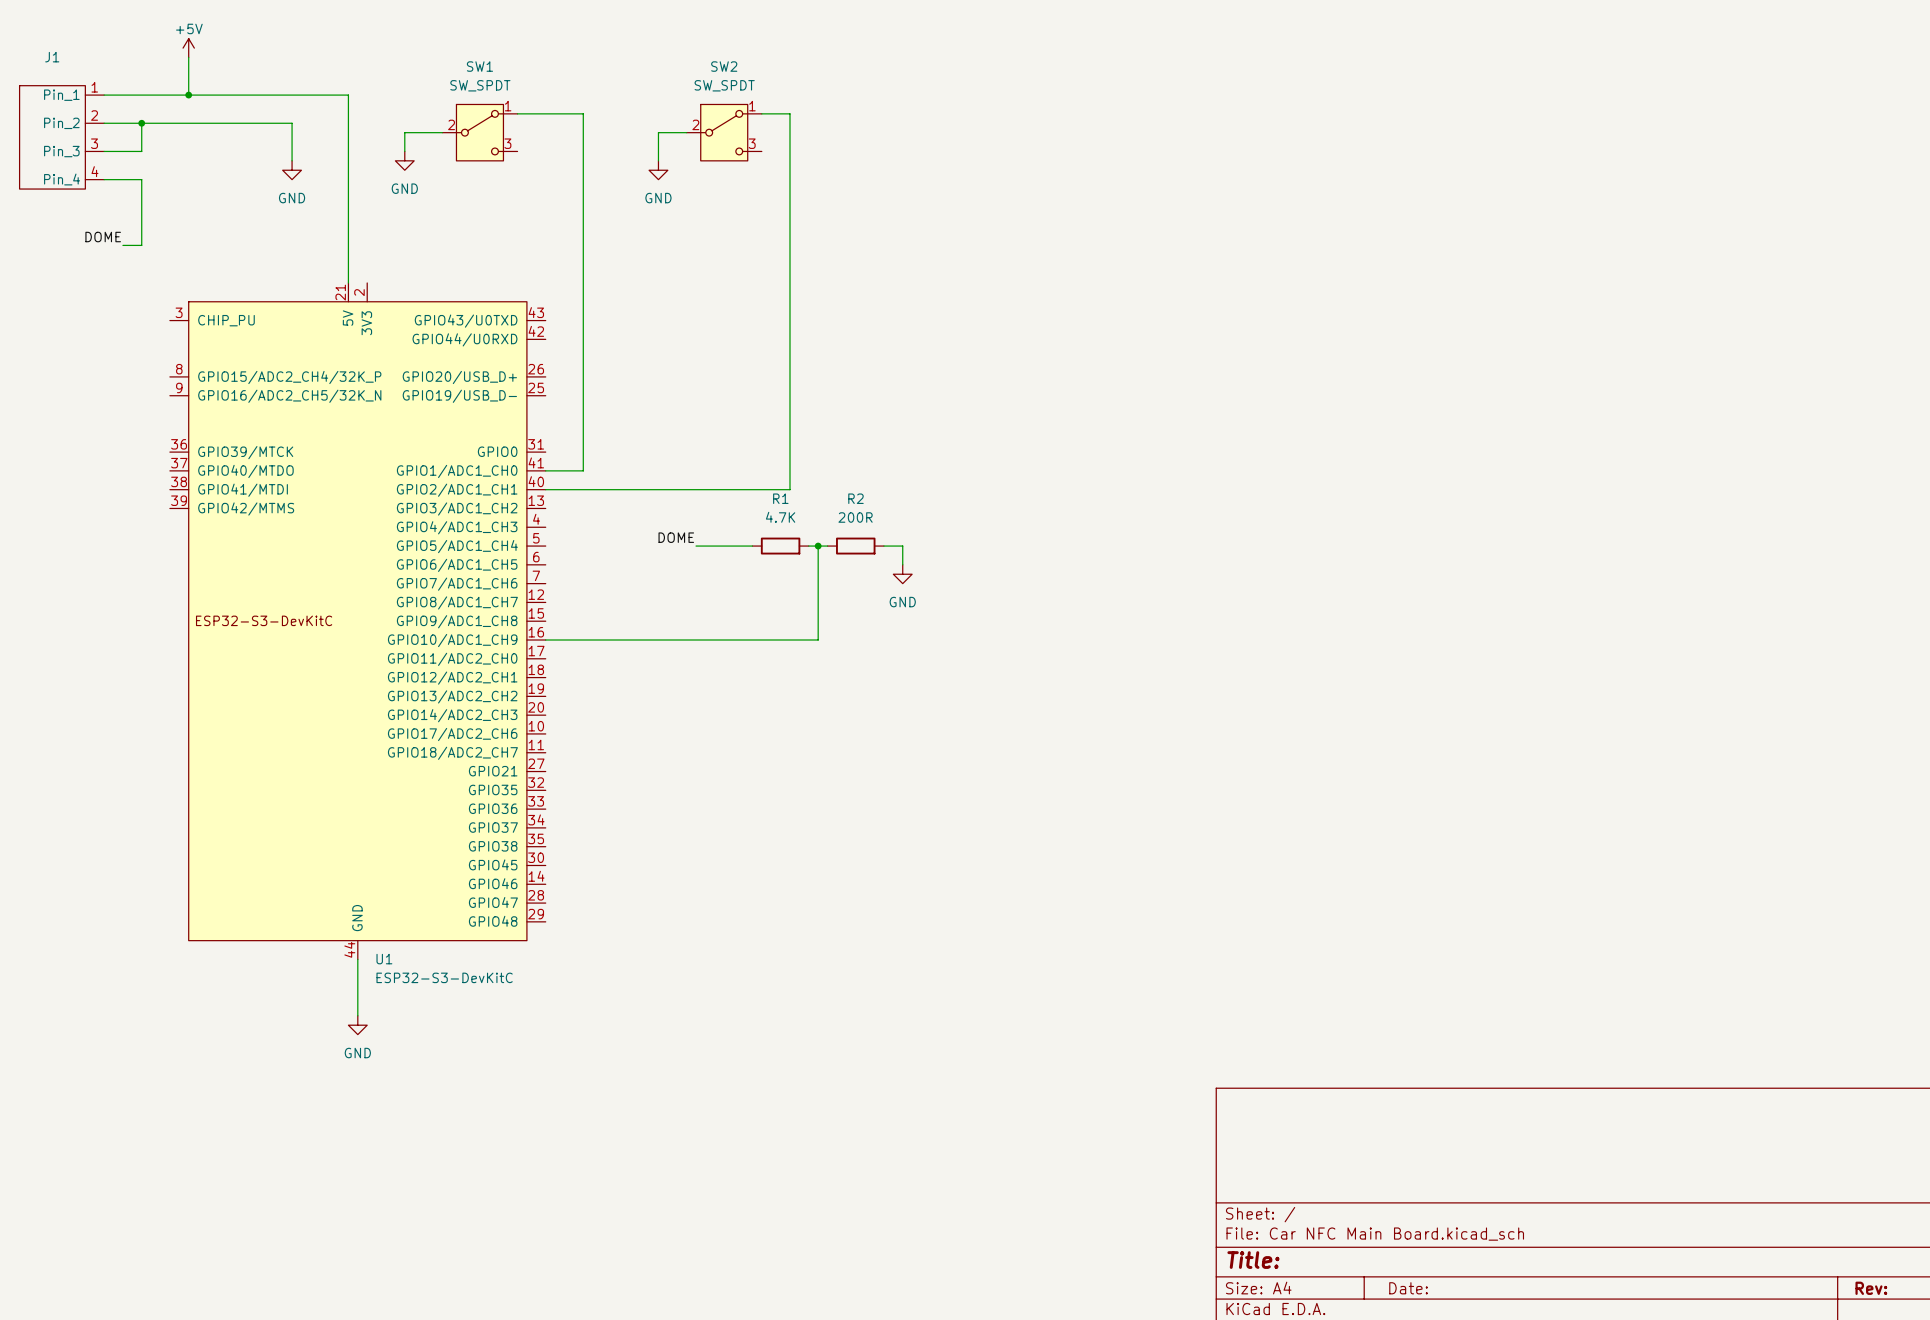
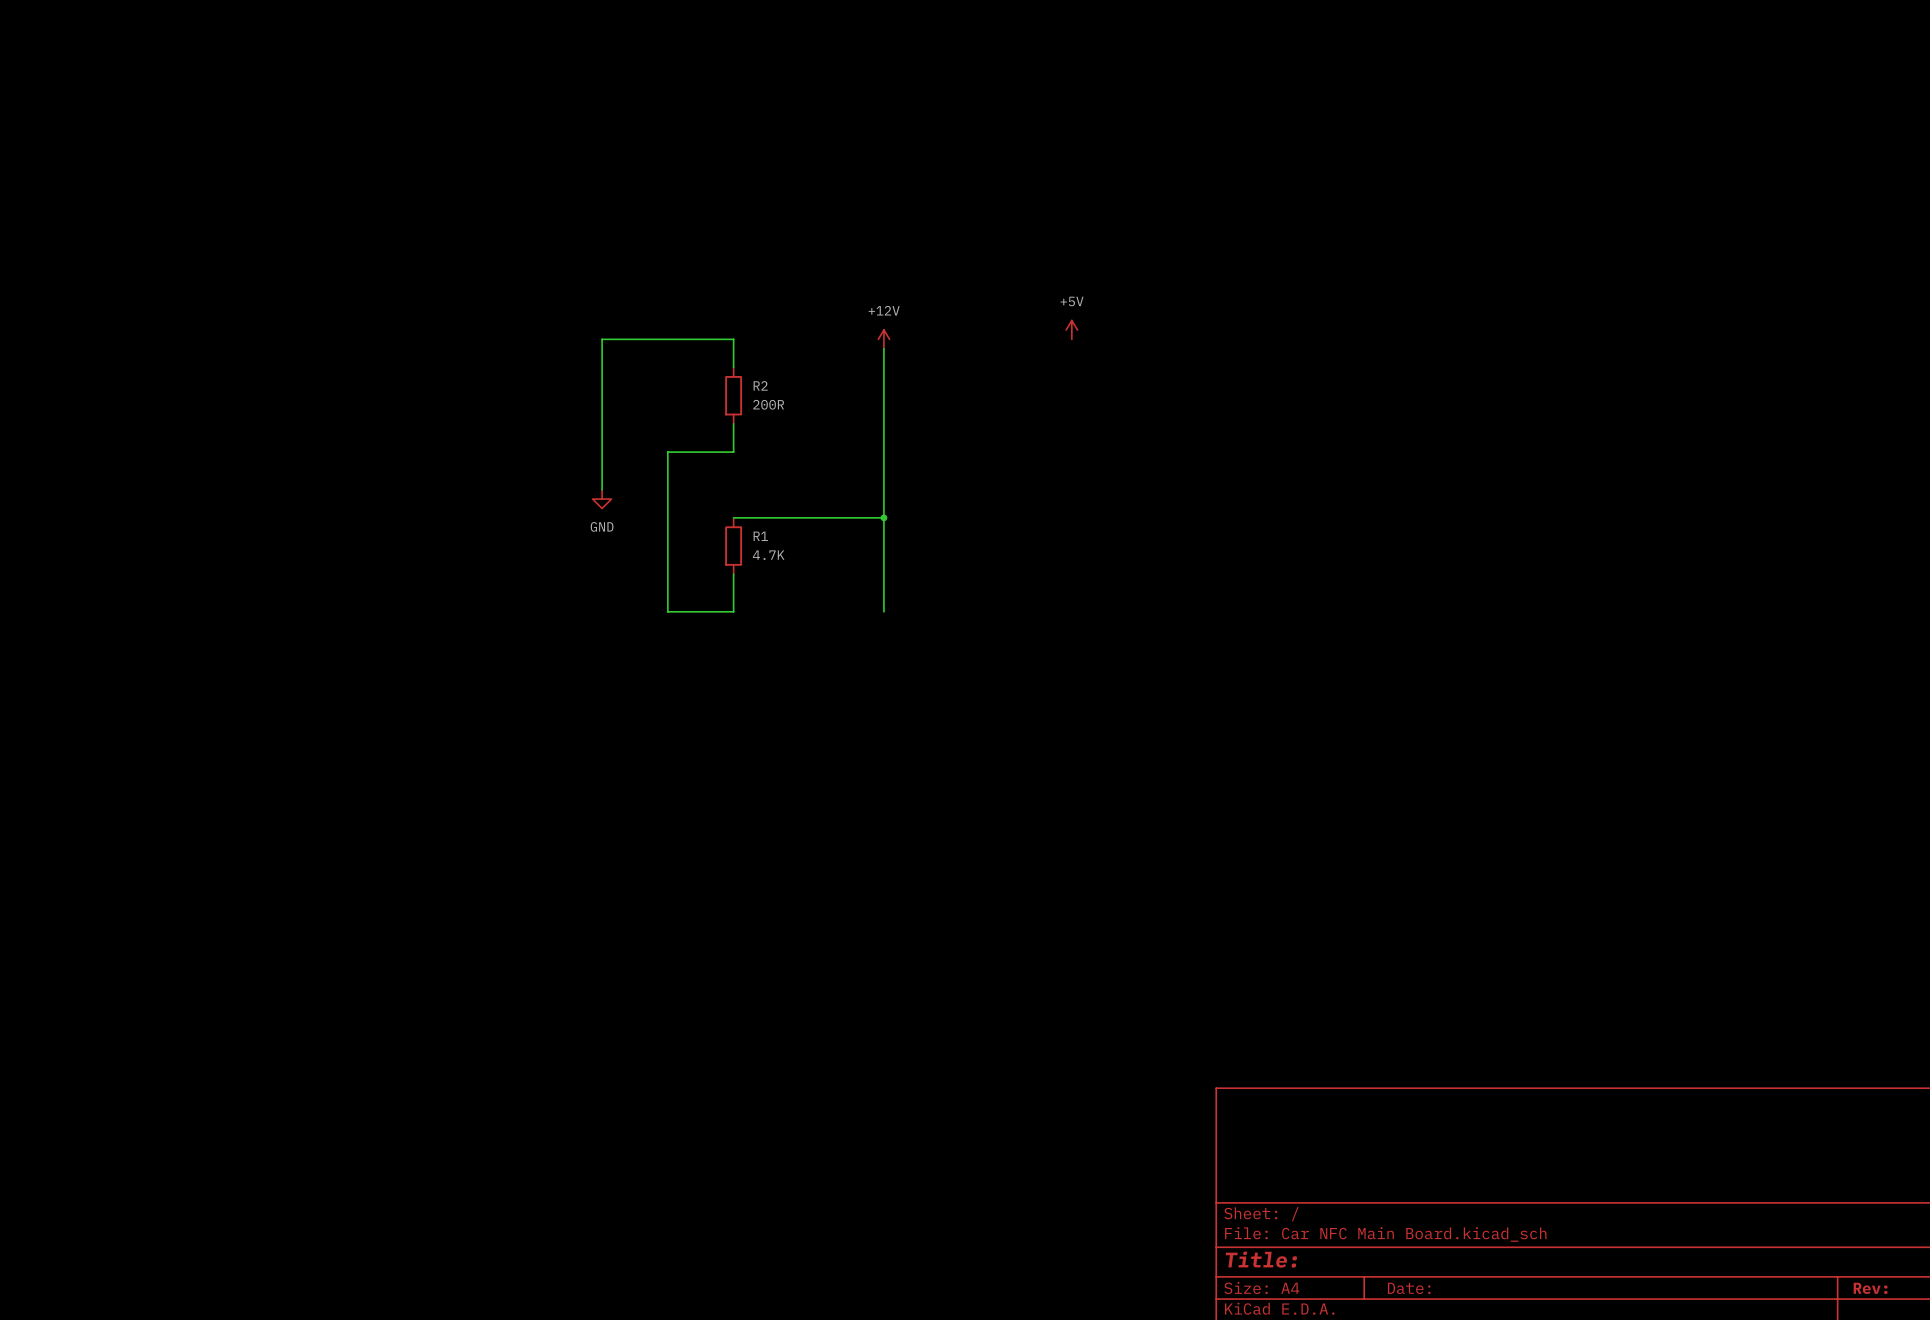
power symbol: +5V (188, 48) -> none
wire: (188, 57) (188, 95) -> none
wire: (104, 95) (348, 95) (348, 282) -> none
junction: (188, 95) -> none
wire: (517, 113) (583, 113) (583, 470) (545, 470) -> none
wire: (761, 113) (789, 113) (789, 489) (545, 489) -> none
wire: (104, 123) (292, 123) (292, 160) -> none
wire: (141, 123) (141, 151) (104, 151) -> none
junction: (141, 123) -> none
wire: (442, 132) (404, 132) (404, 151) -> none
SW1: SW_SPDT (479, 132) -> none
wire: (686, 132) (658, 132) (658, 160) -> none
SW2: SW_SPDT (724, 132) -> none
J1: (61, 137) -> none
power symbol: GND (404, 160) -> none
power symbol: GND (292, 170) -> none
power symbol: GND (658, 170) -> none
wire: (104, 179) (141, 179) (141, 245) (122, 245) -> none
label: DOME (103, 237) -> none
power symbol: none -> +5V (1071, 329)
power symbol: none -> +12V (883, 339)
wire: none -> (883, 348) (883, 611)
wire: none -> (733, 367) (733, 339) (602, 339) (602, 489)
wire: none -> (733, 423) (733, 452) (667, 452) (667, 611) (733, 611) (733, 574)
R1 name position: R1 (780, 498) -> R1 (760, 536)
R2 name position: R2 (855, 498) -> R2 (760, 385)
power symbol: none -> GND (602, 499)
wire: none -> (733, 517) (883, 517)
R2 value position: 200R (855, 517) -> 200R (768, 404)
junction: none -> (883, 517)
label: DOME (676, 537) -> none
wire: (696, 546) (752, 546) -> none
R1 rotation: 0° (780, 546) -> 90° clockwise (733, 546)
R1 position: (780, 546) -> (733, 546)
wire: (808, 546) (827, 546) -> none
wire: (818, 546) (818, 640) (545, 640) -> none
junction: (818, 546) -> none
R2 rotation: 0° (855, 546) -> 90° clockwise (733, 395)
R2 position: (855, 546) -> (733, 395)
wire: (883, 546) (902, 546) (902, 564) -> none
power symbol: GND (902, 574) -> none
U1: ESP32-S3-DevKitC (357, 621) -> none
wire: (357, 959) (357, 1015) -> none
power symbol: GND (357, 1025) -> none

